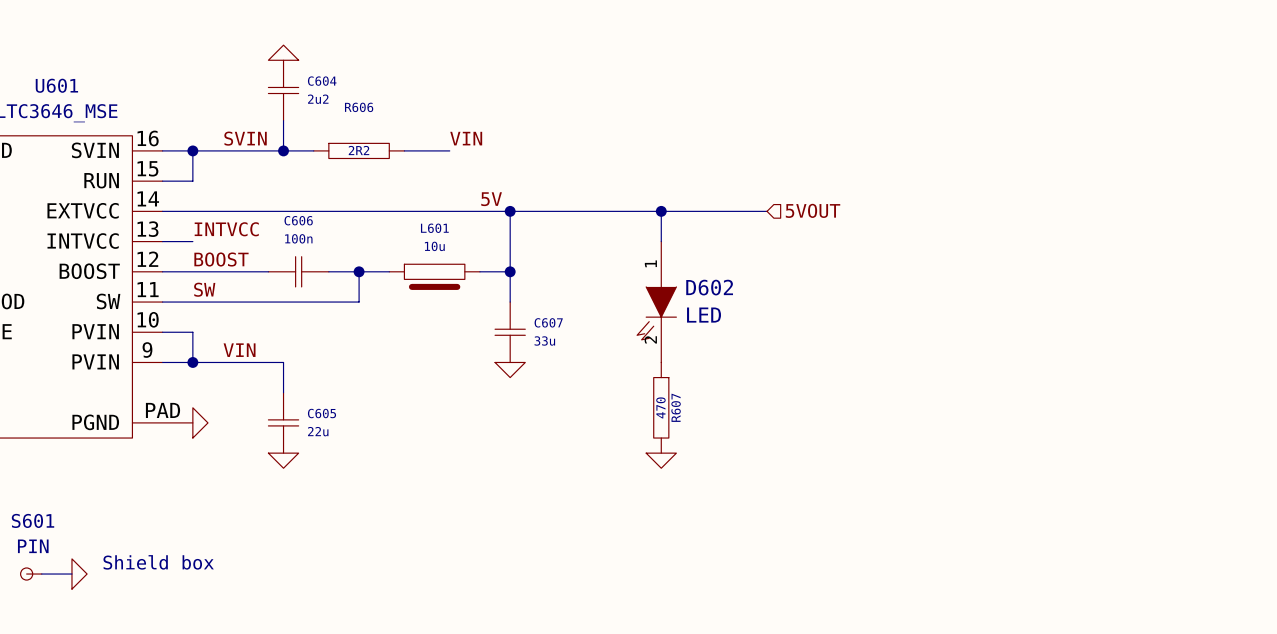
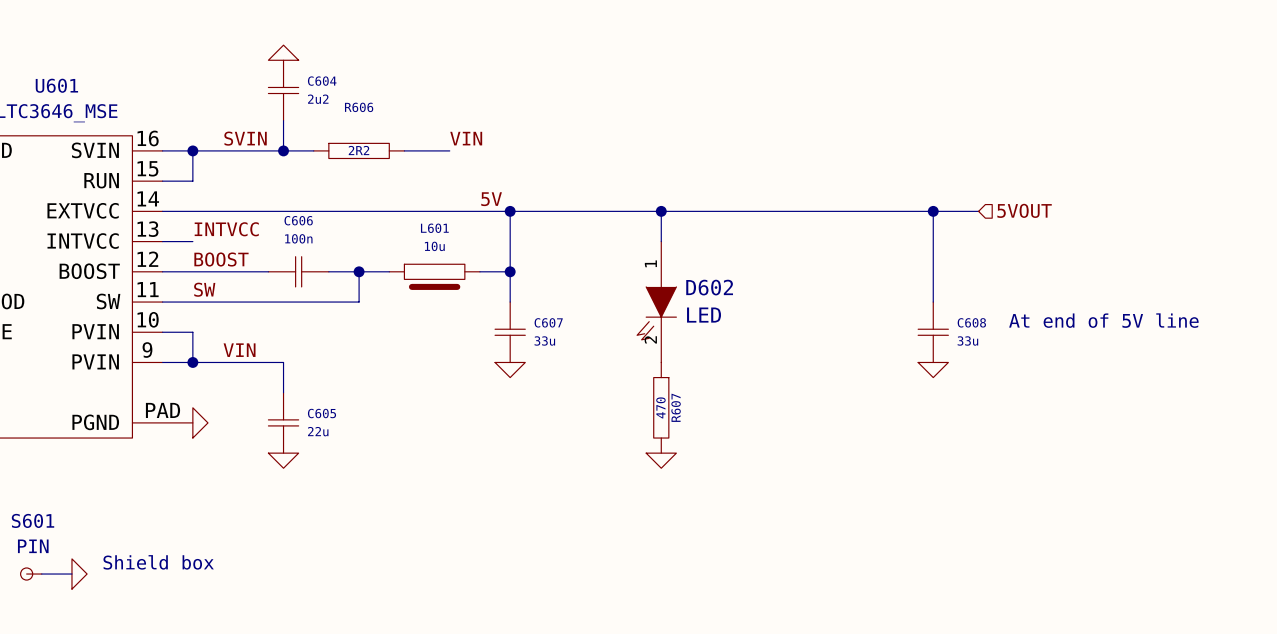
hierarchical label position: 5VOUT (813, 210) -> 5VOUT (1024, 210)
wire: none -> (767, 211) (978, 211)
wire: none -> (933, 211) (933, 302)
junction: none -> (933, 211)
text: none -> At end of 5V line (1103, 320)
C608: none -> 33u (933, 332)
power symbol: none -> (933, 370)

